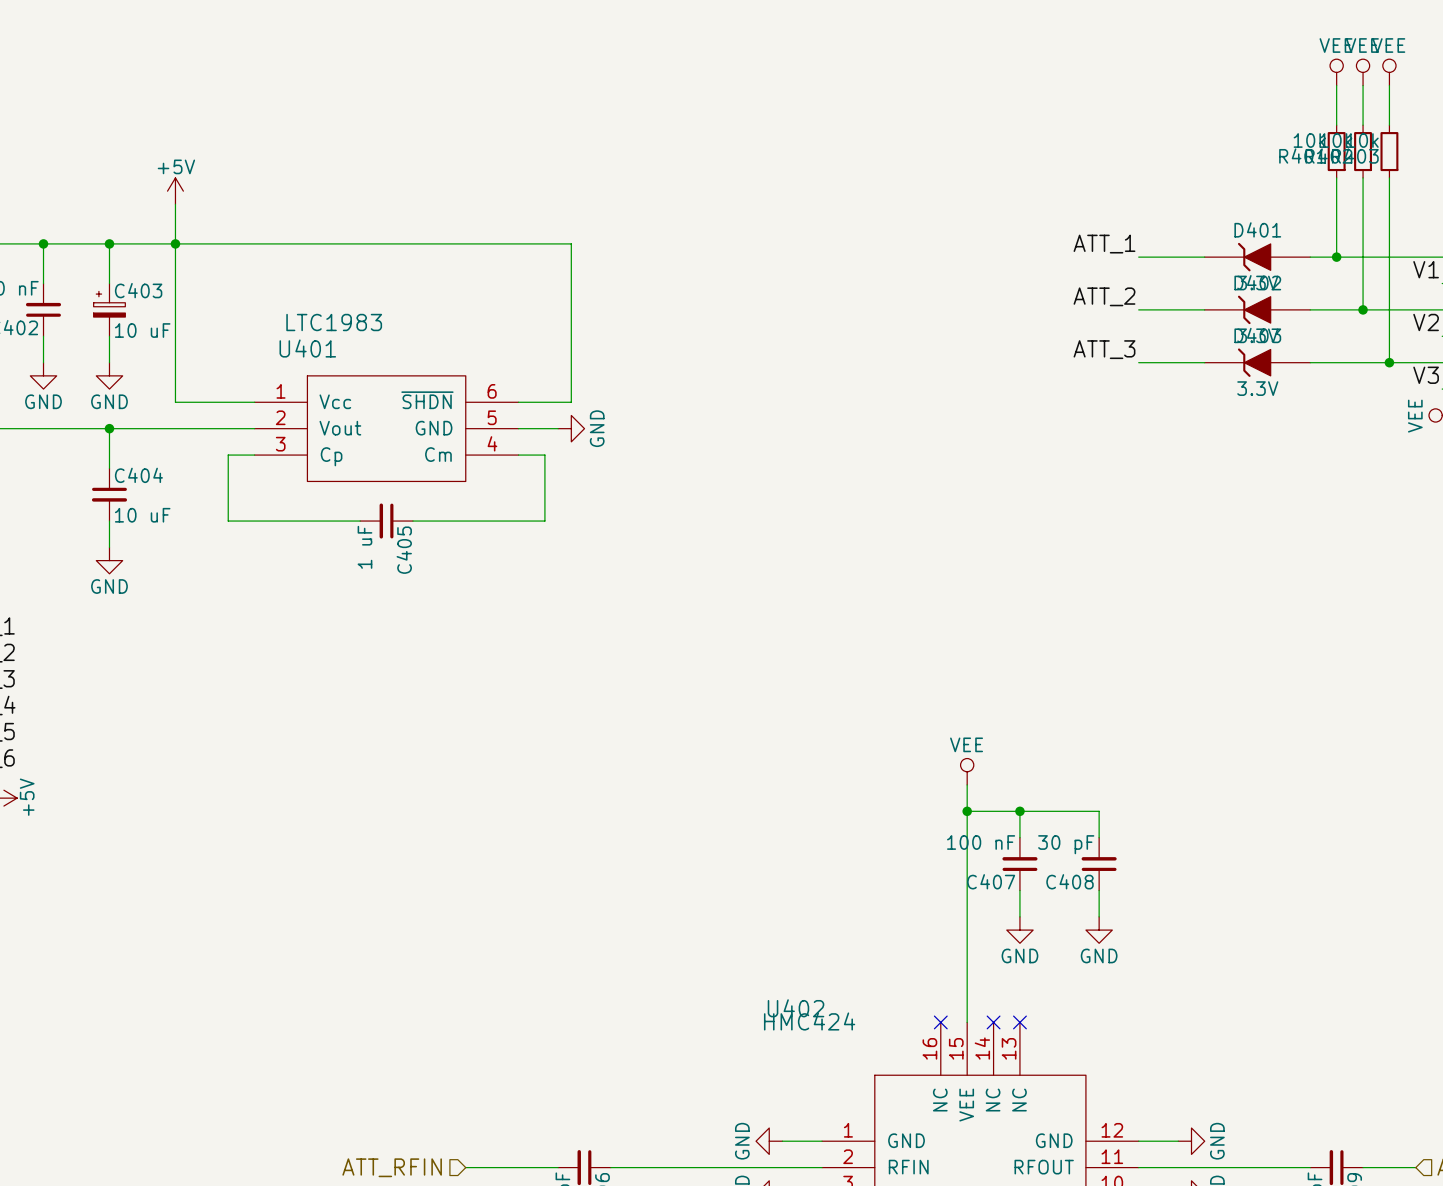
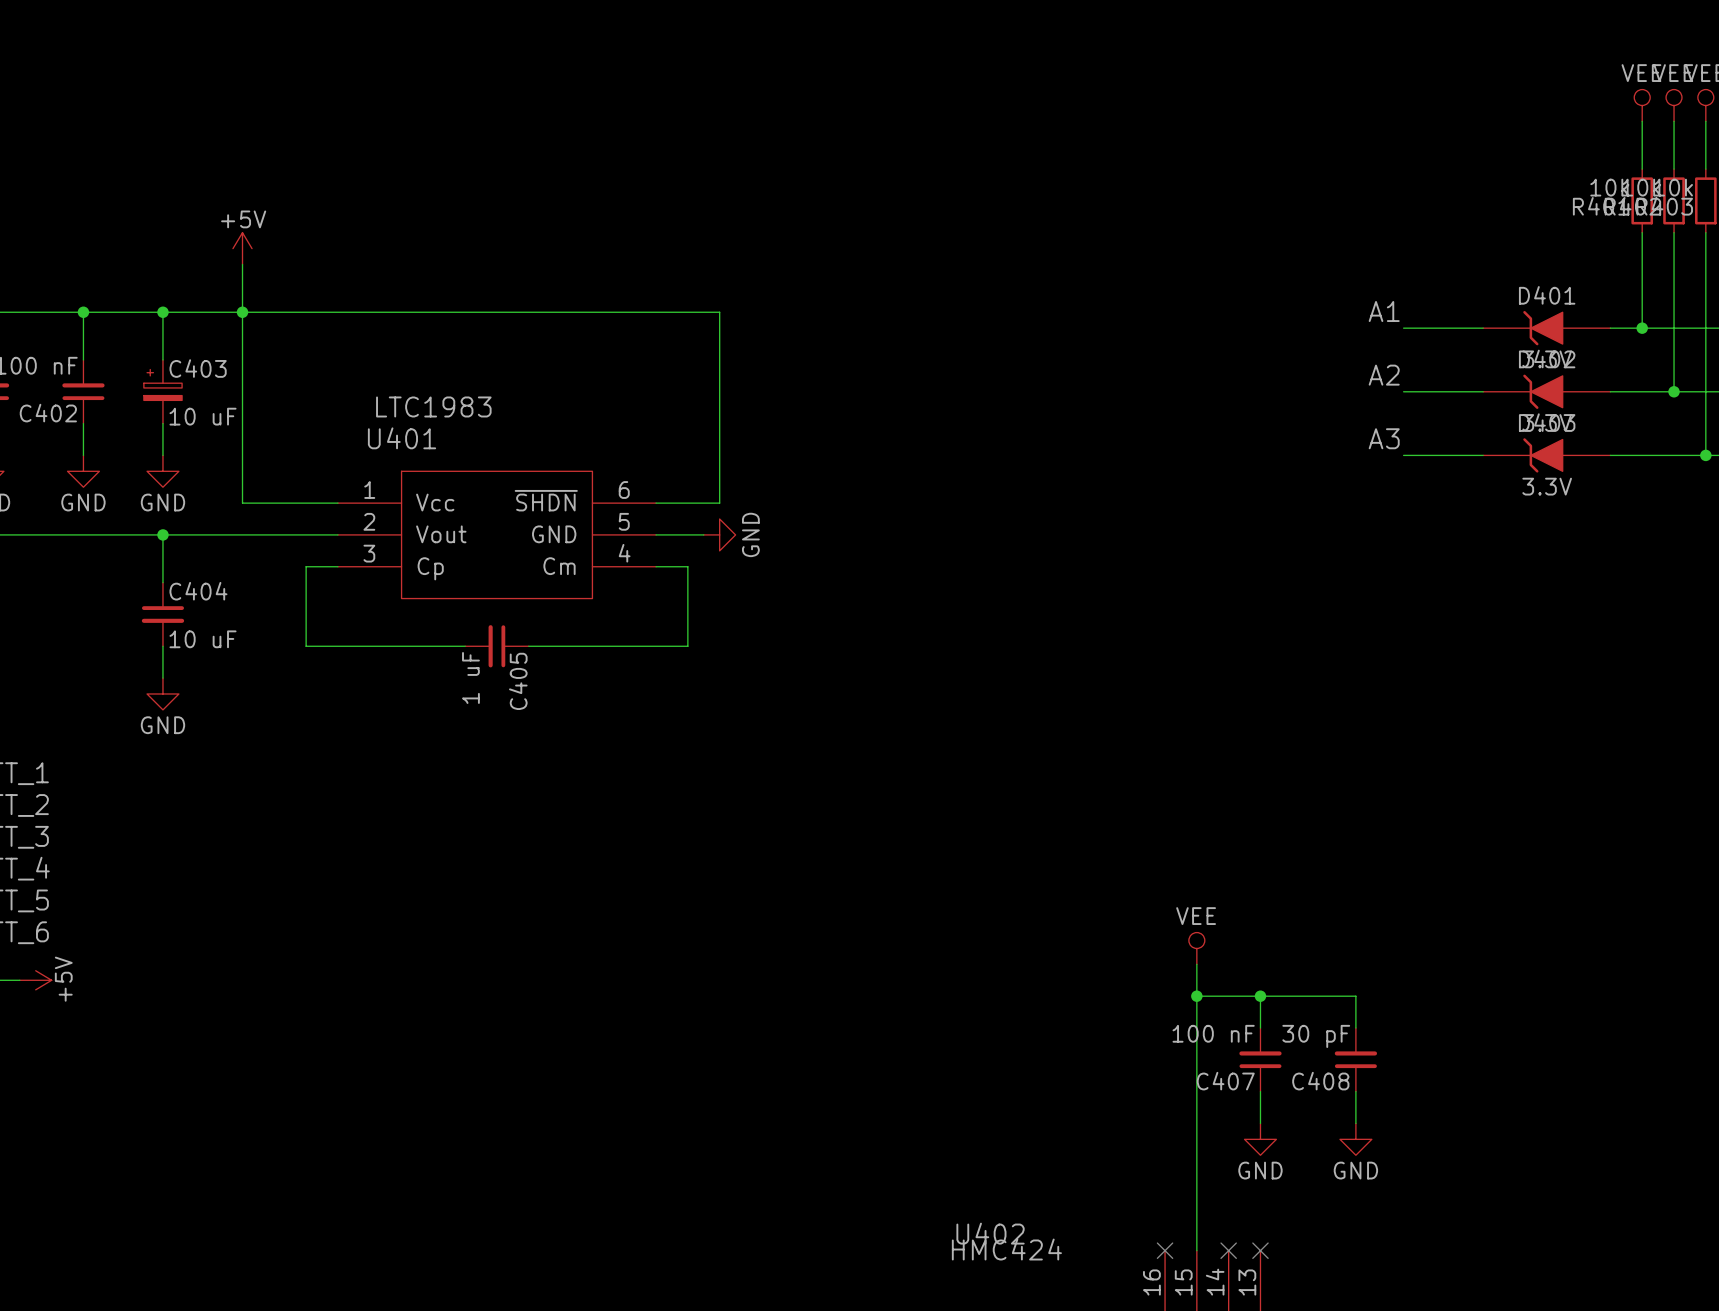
label: ATT_1 (1104, 244) -> A1 (1384, 311)
label: ATT_2 (1104, 296) -> A2 (1384, 375)
label: ATT_3 (1104, 349) -> A3 (1384, 438)

